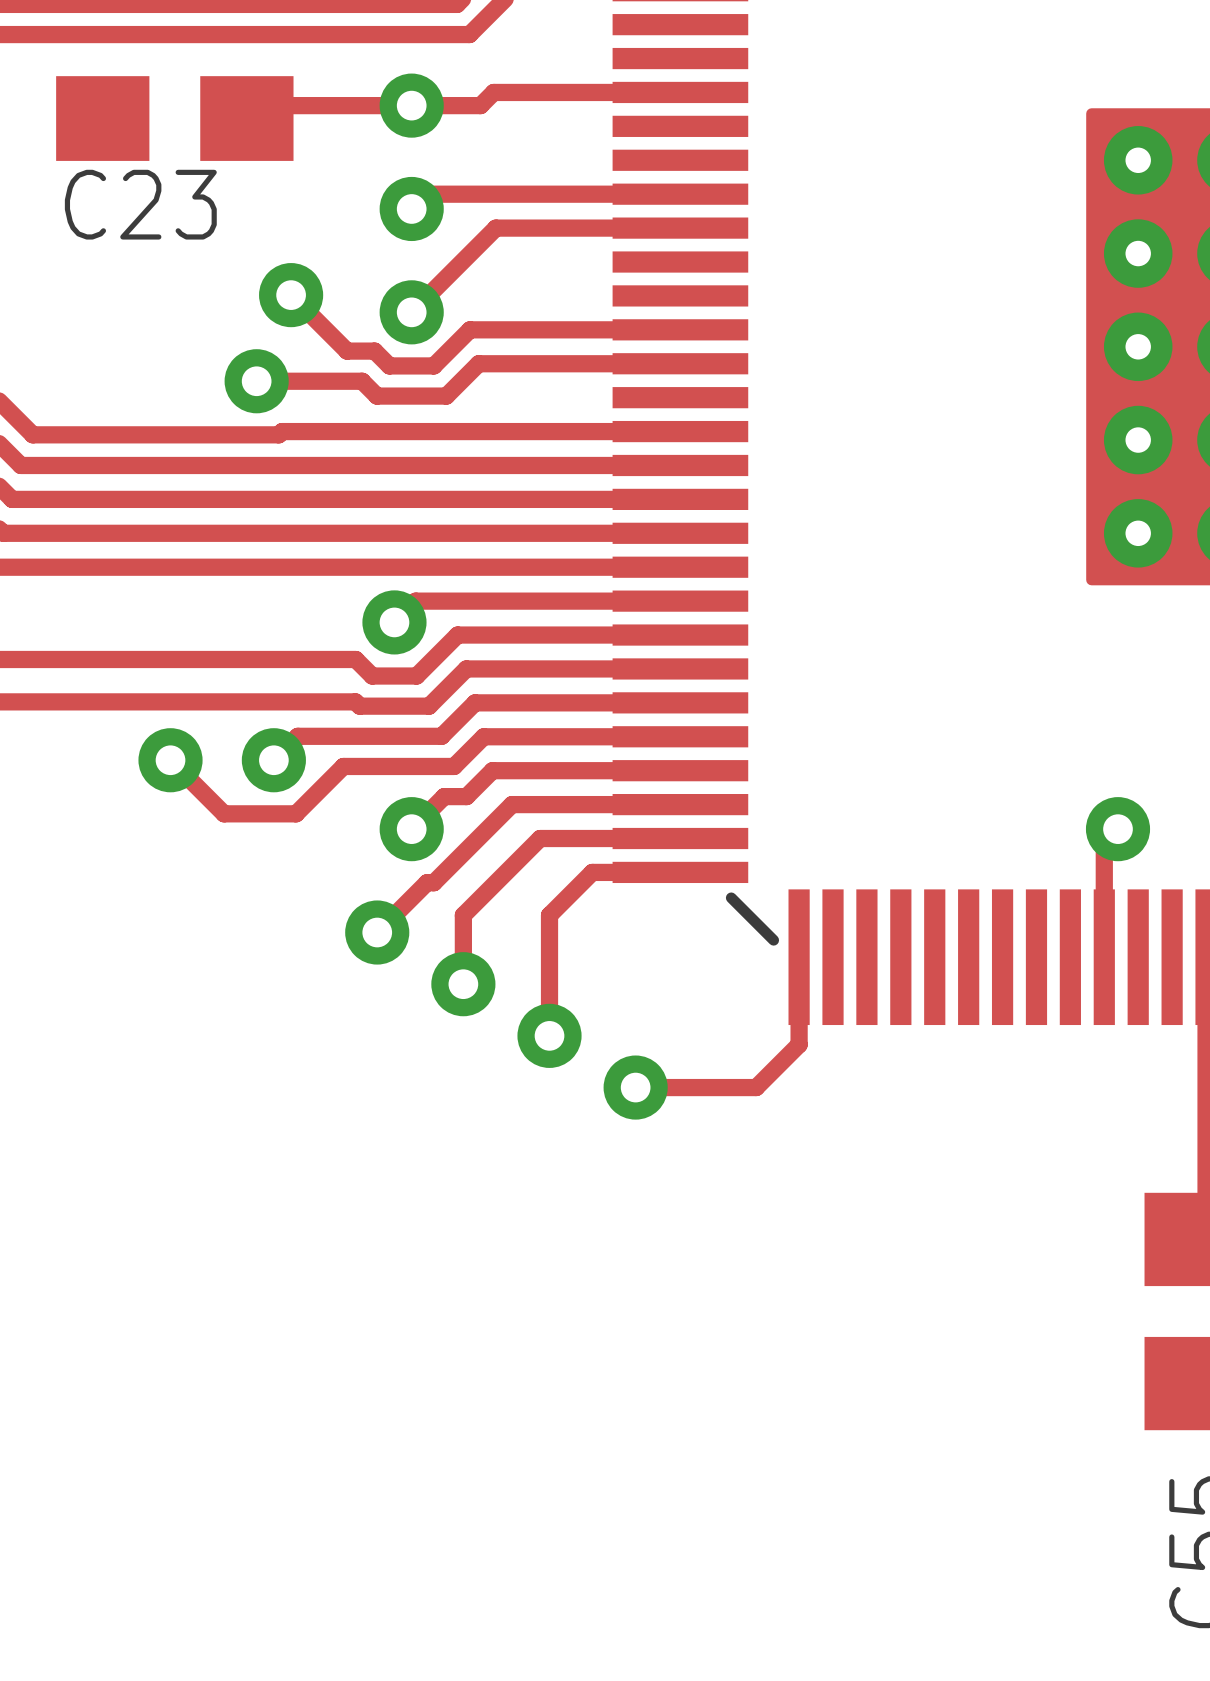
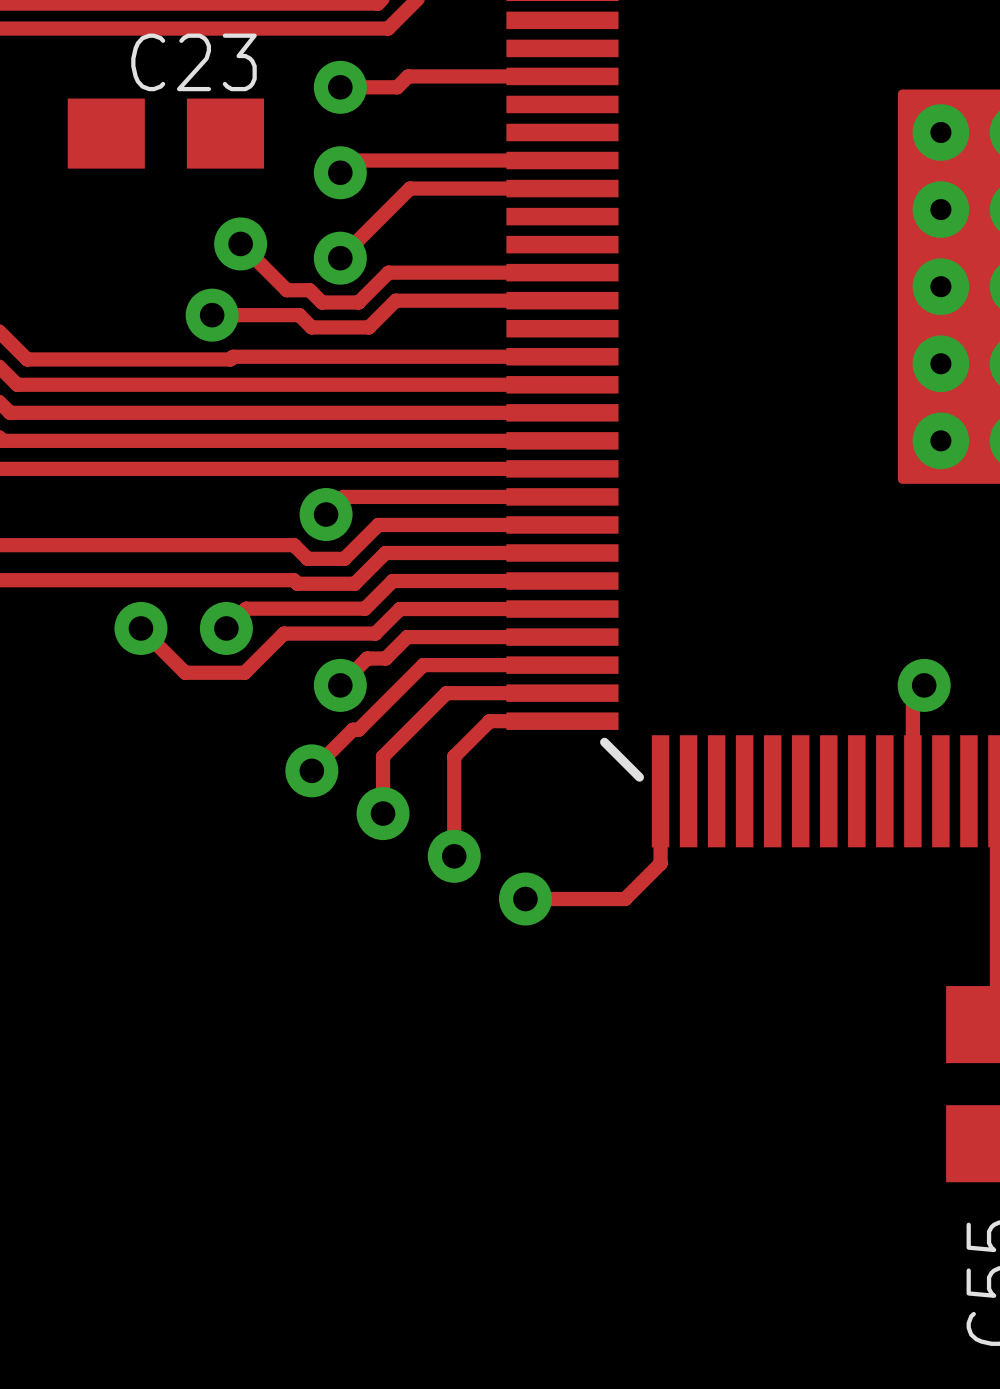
track: (411, 105) (259, 105) (246, 118) -> none
C23 position: (174, 118) -> (165, 133)
C23 name position: C23 (140, 204) -> C23 (193, 62)

